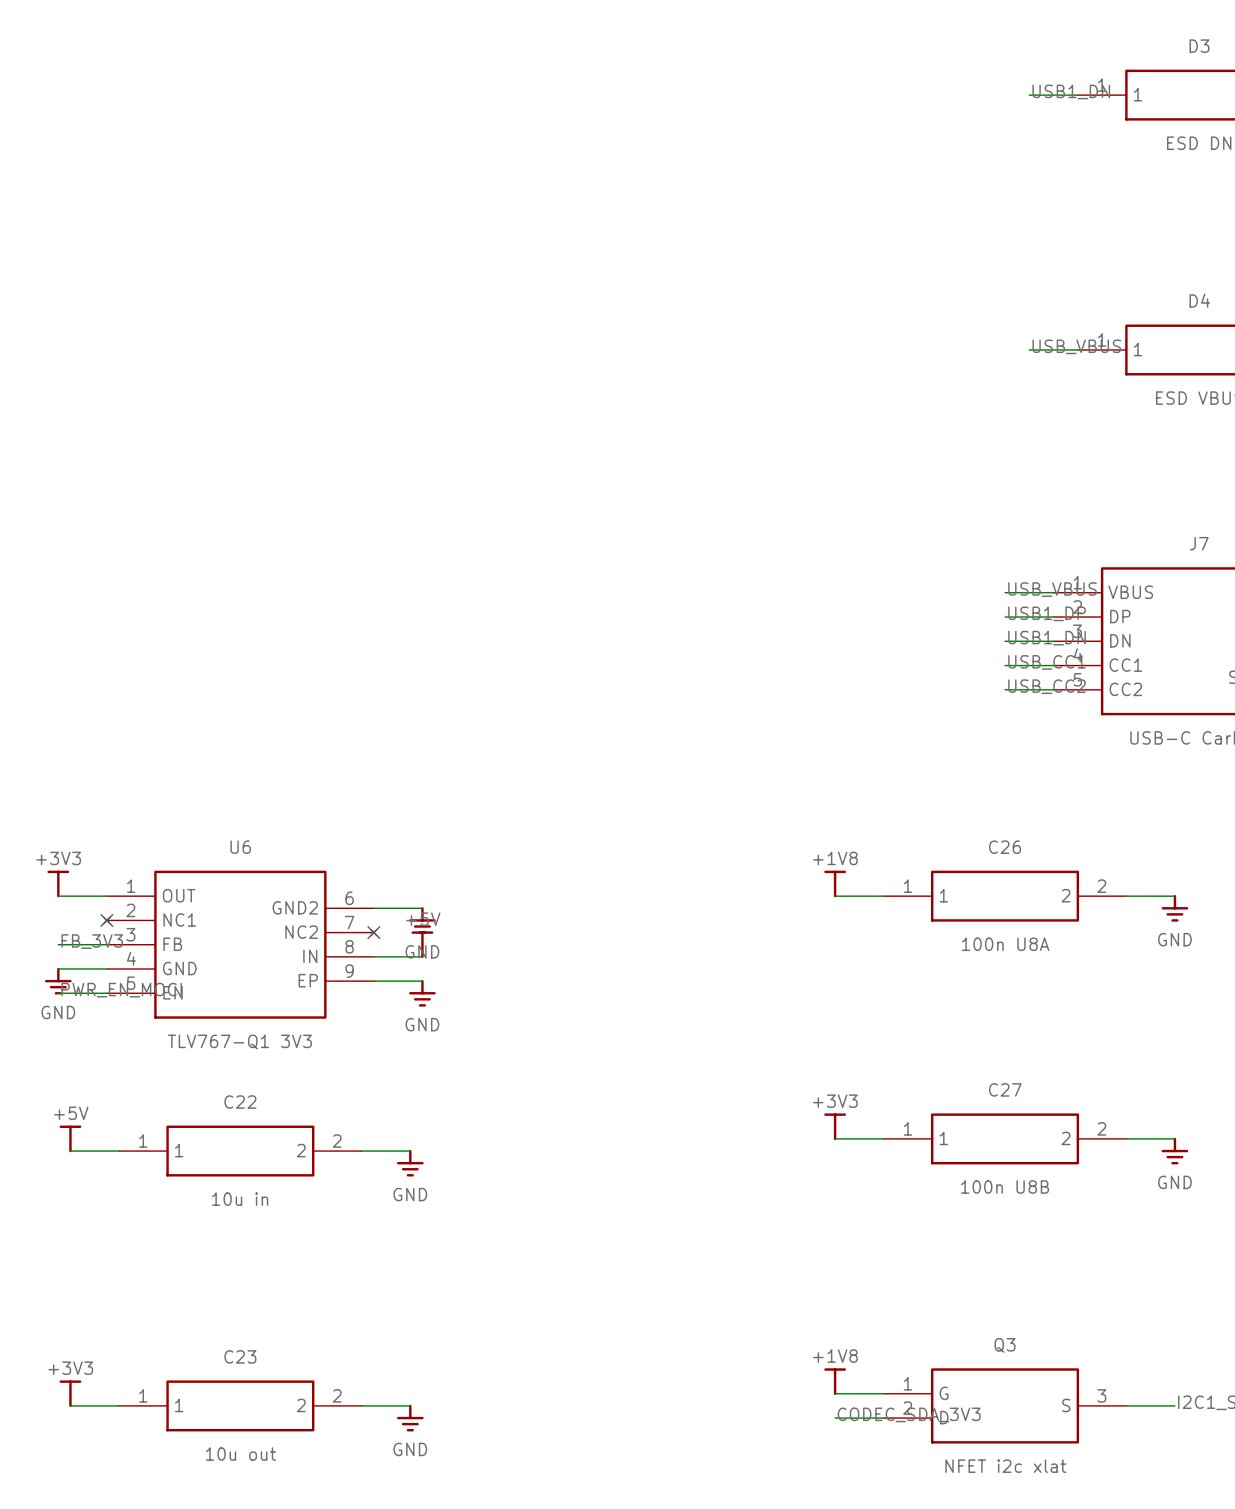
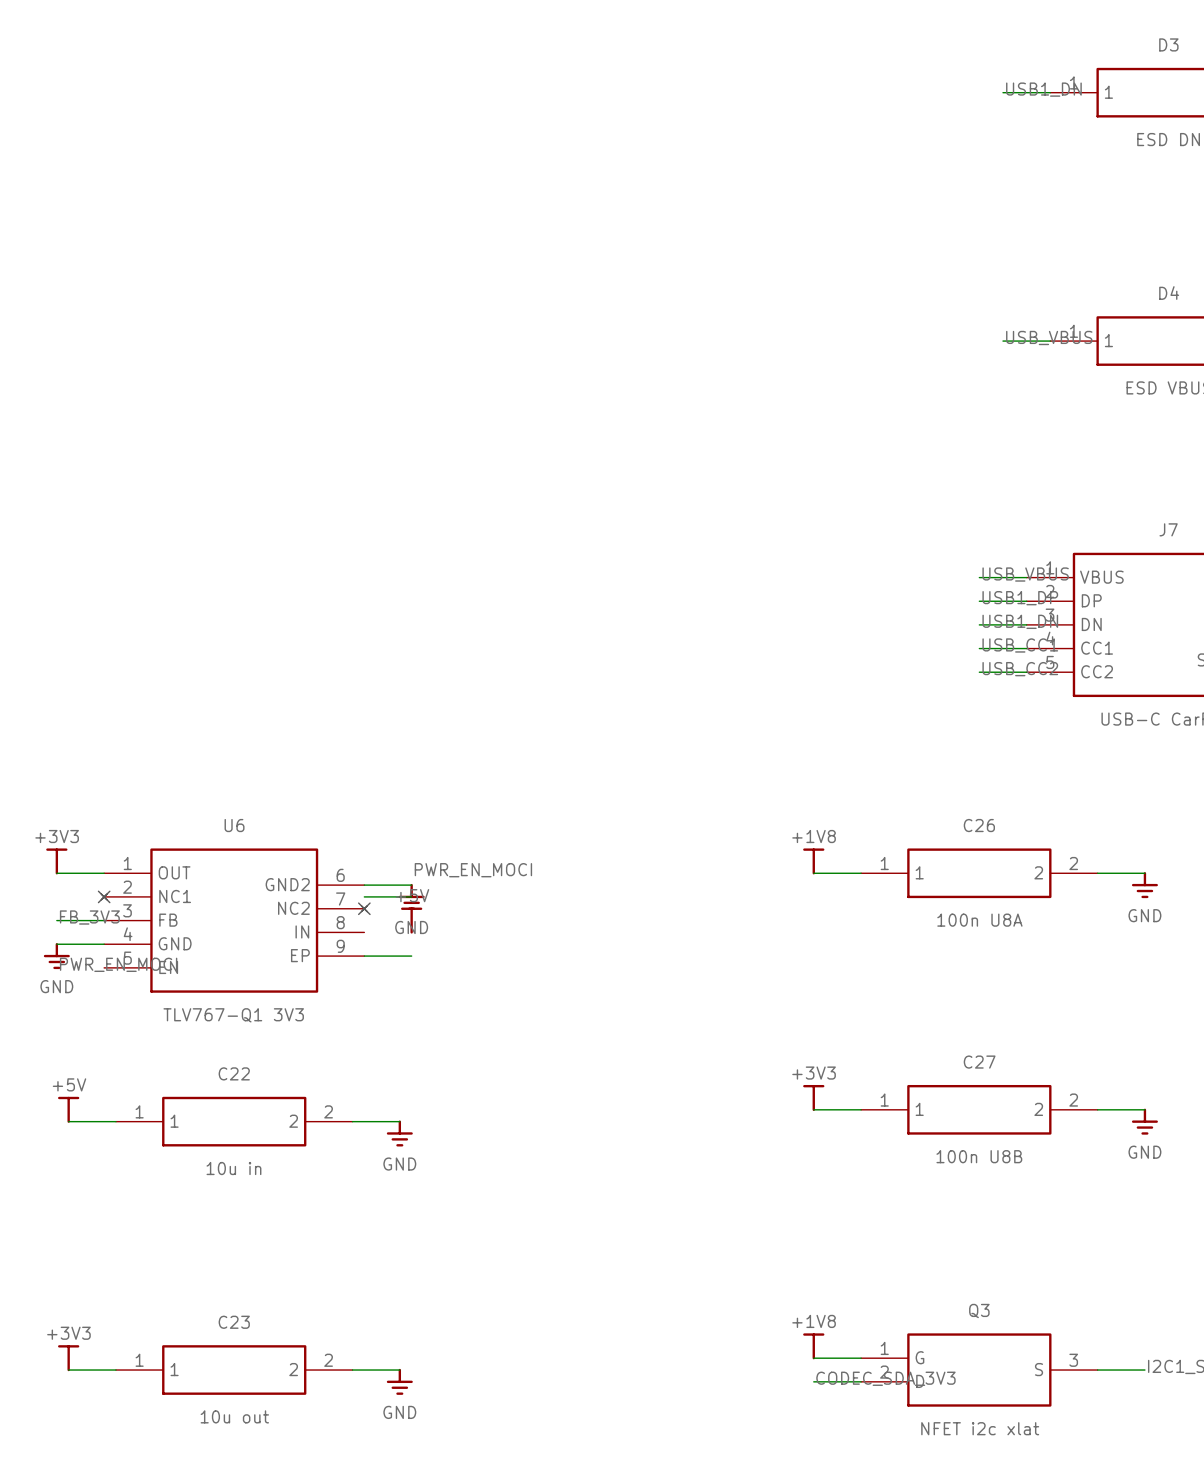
label: none -> PWR_EN_MOCI (473, 870)
wire: (373, 956) (422, 956) -> (364, 896) (411, 896)
wire: (58, 993) (106, 993) -> none
power symbol: GND (422, 993) -> none

